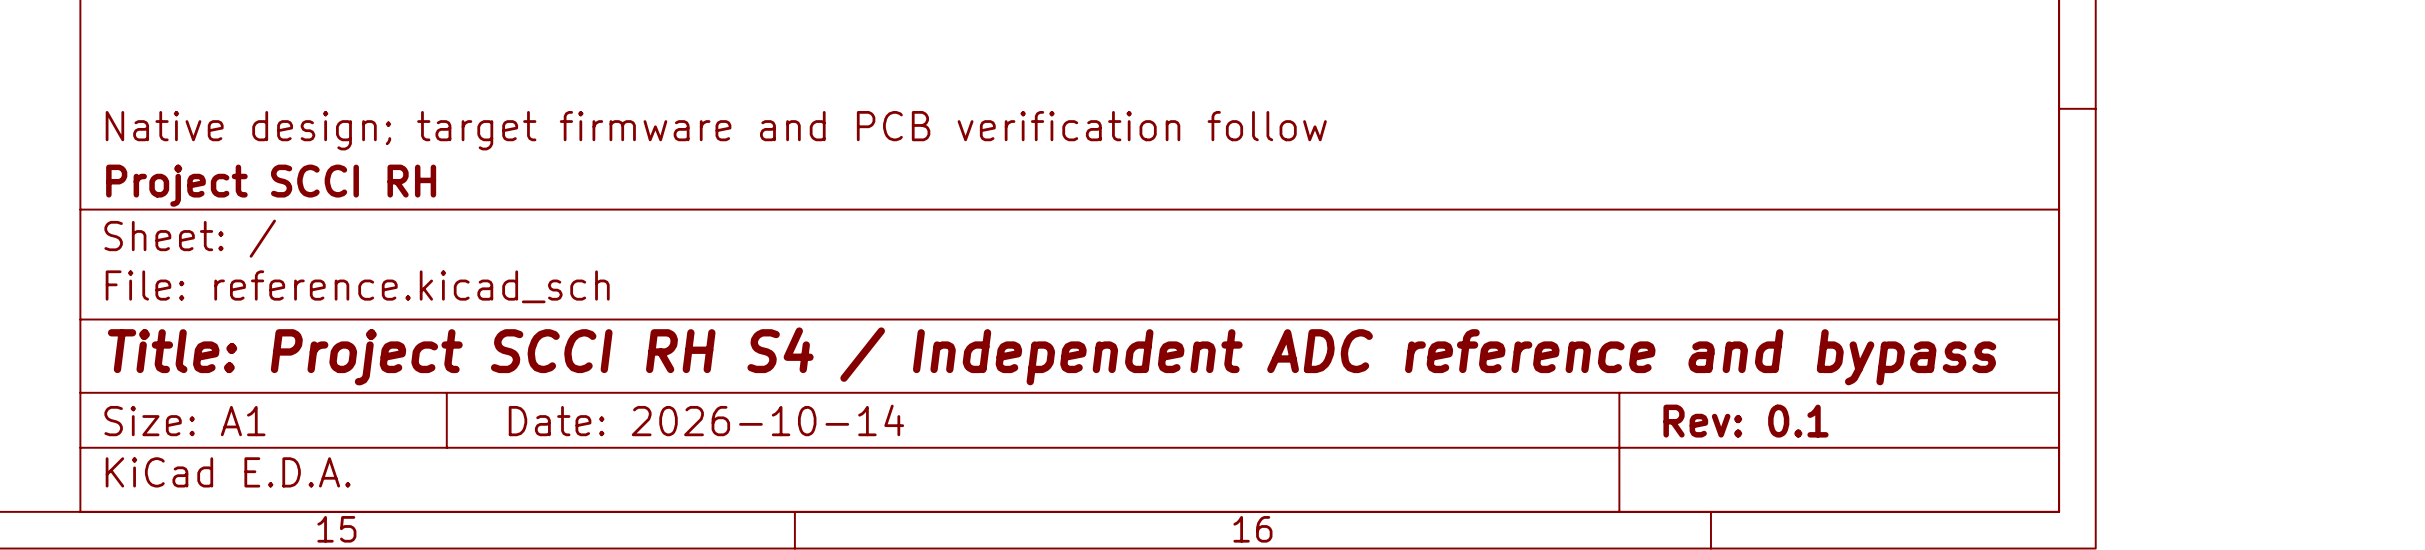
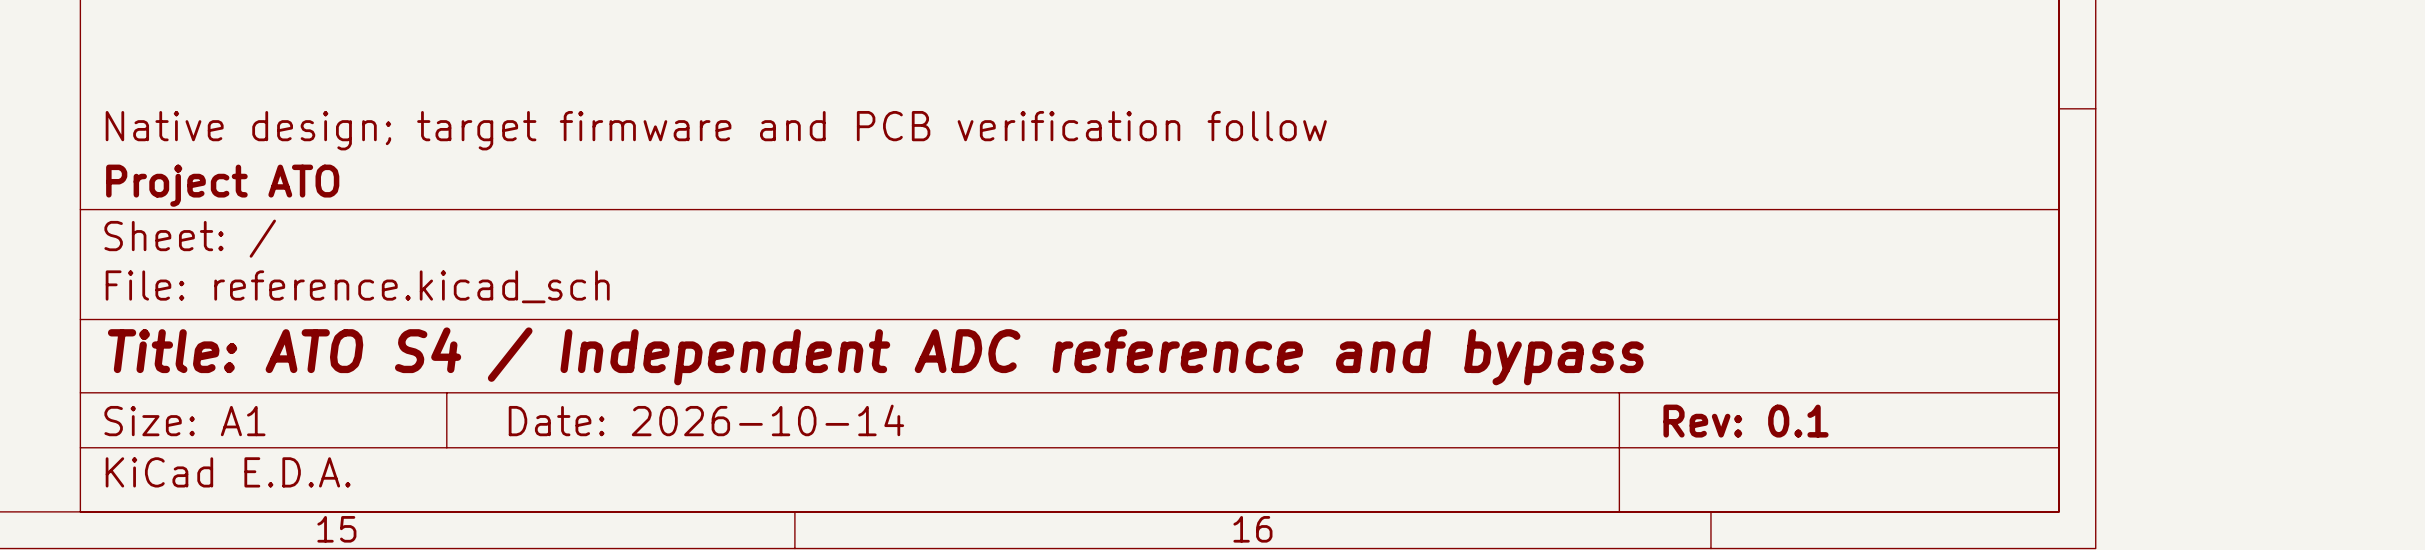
title block: Project SCCI RH (271, 185) -> Project ATO (222, 185)
title block: Title: Project SCCI RH S4 / Independent ADC reference and bypass (1052, 356) -> Title: ATO S4 / Independent ADC reference and bypass (875, 356)

